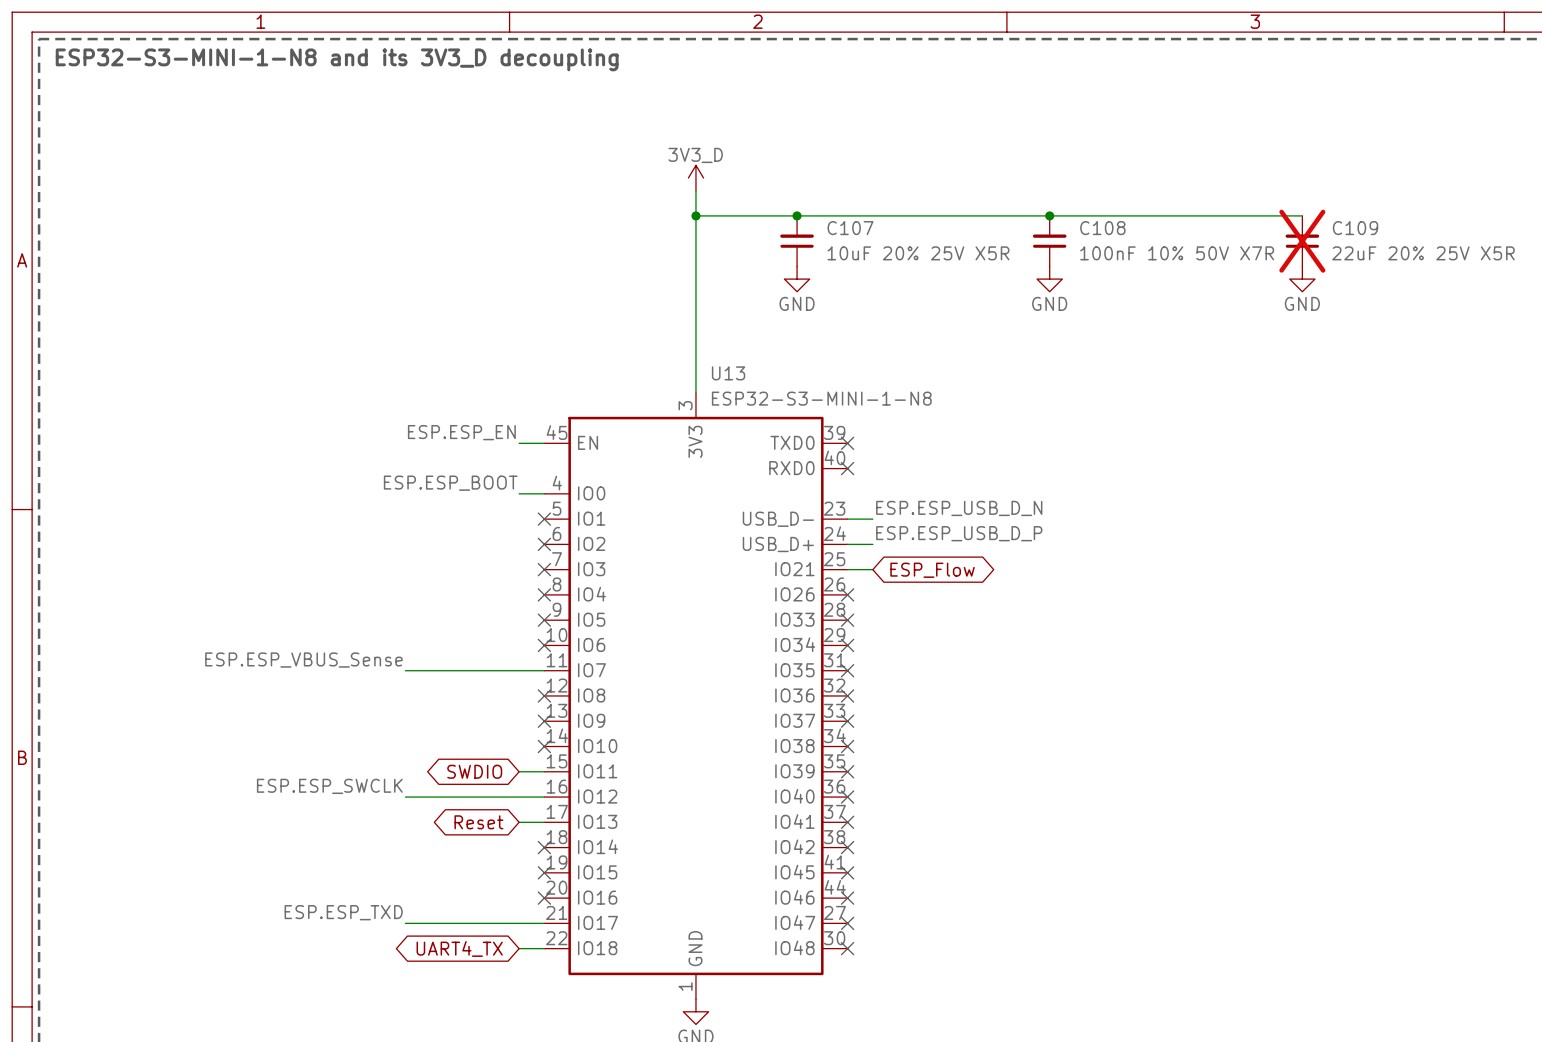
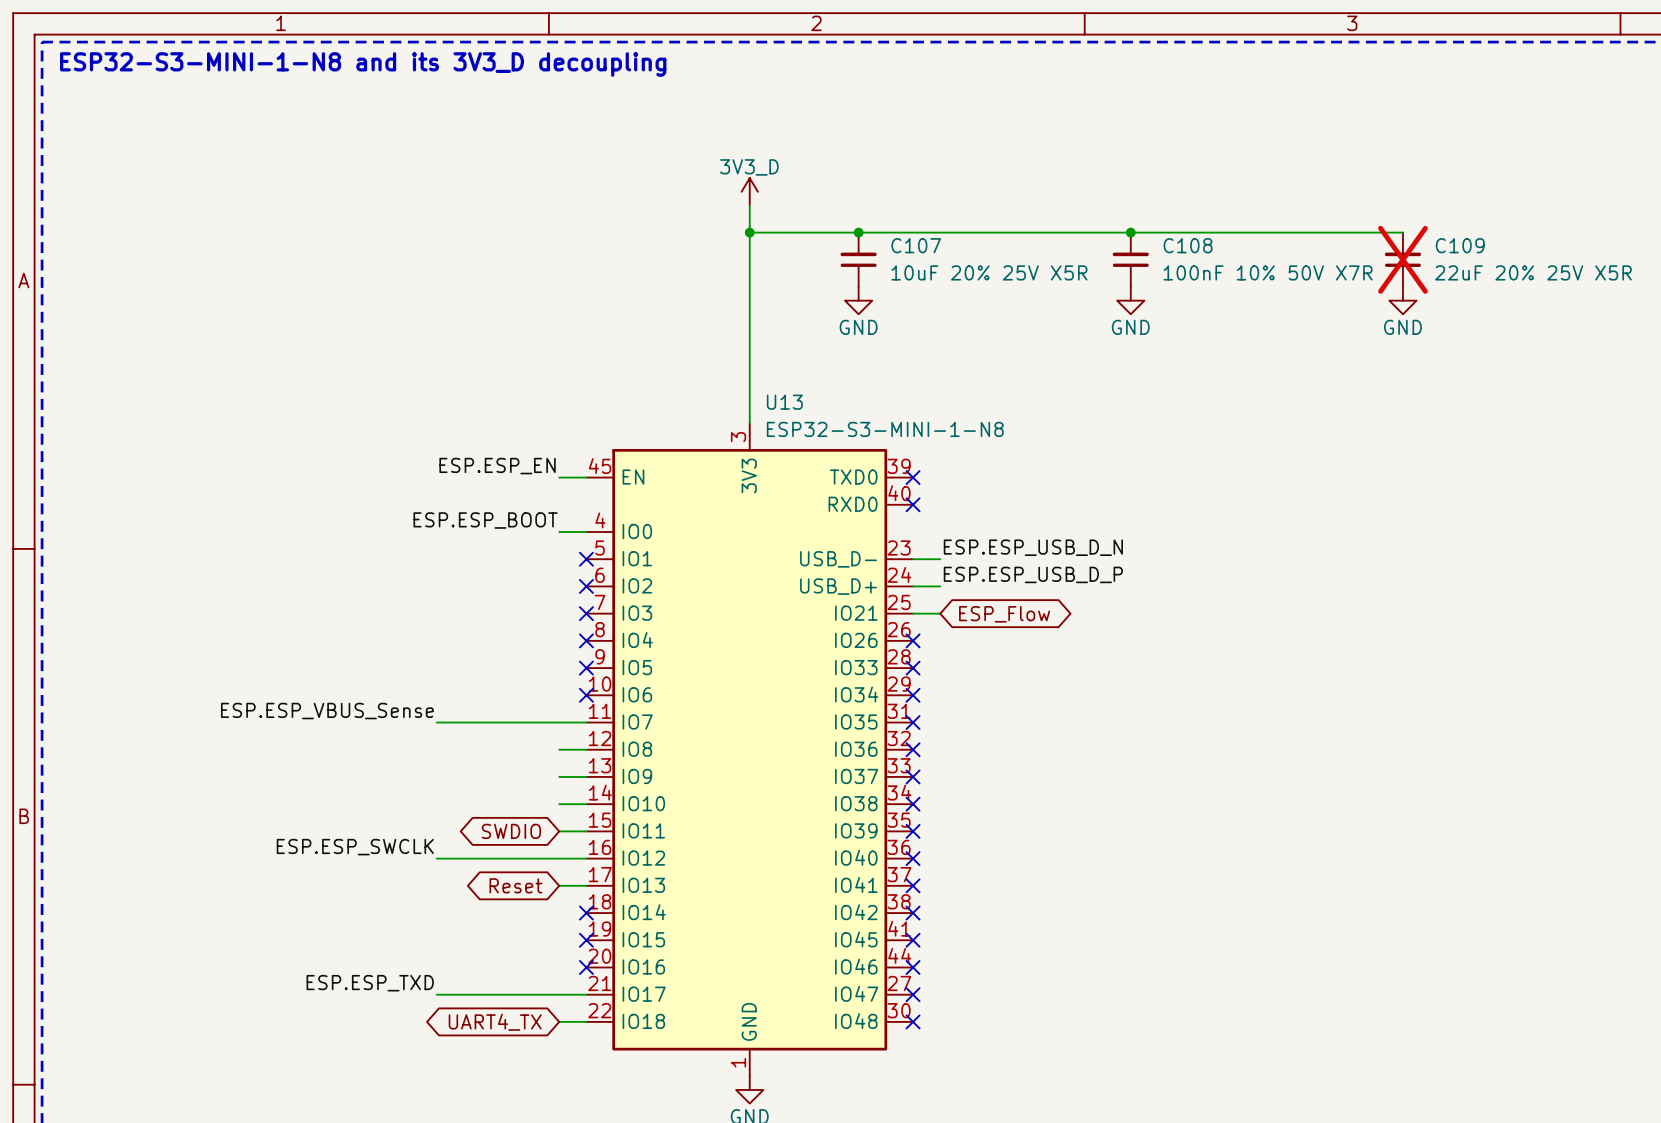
wire: none -> (559, 749) (586, 749)
no-connect mark: (544, 695) -> none
wire: none -> (559, 776) (586, 776)
no-connect mark: (544, 721) -> none
wire: none -> (559, 804) (586, 804)
no-connect mark: (544, 746) -> none

